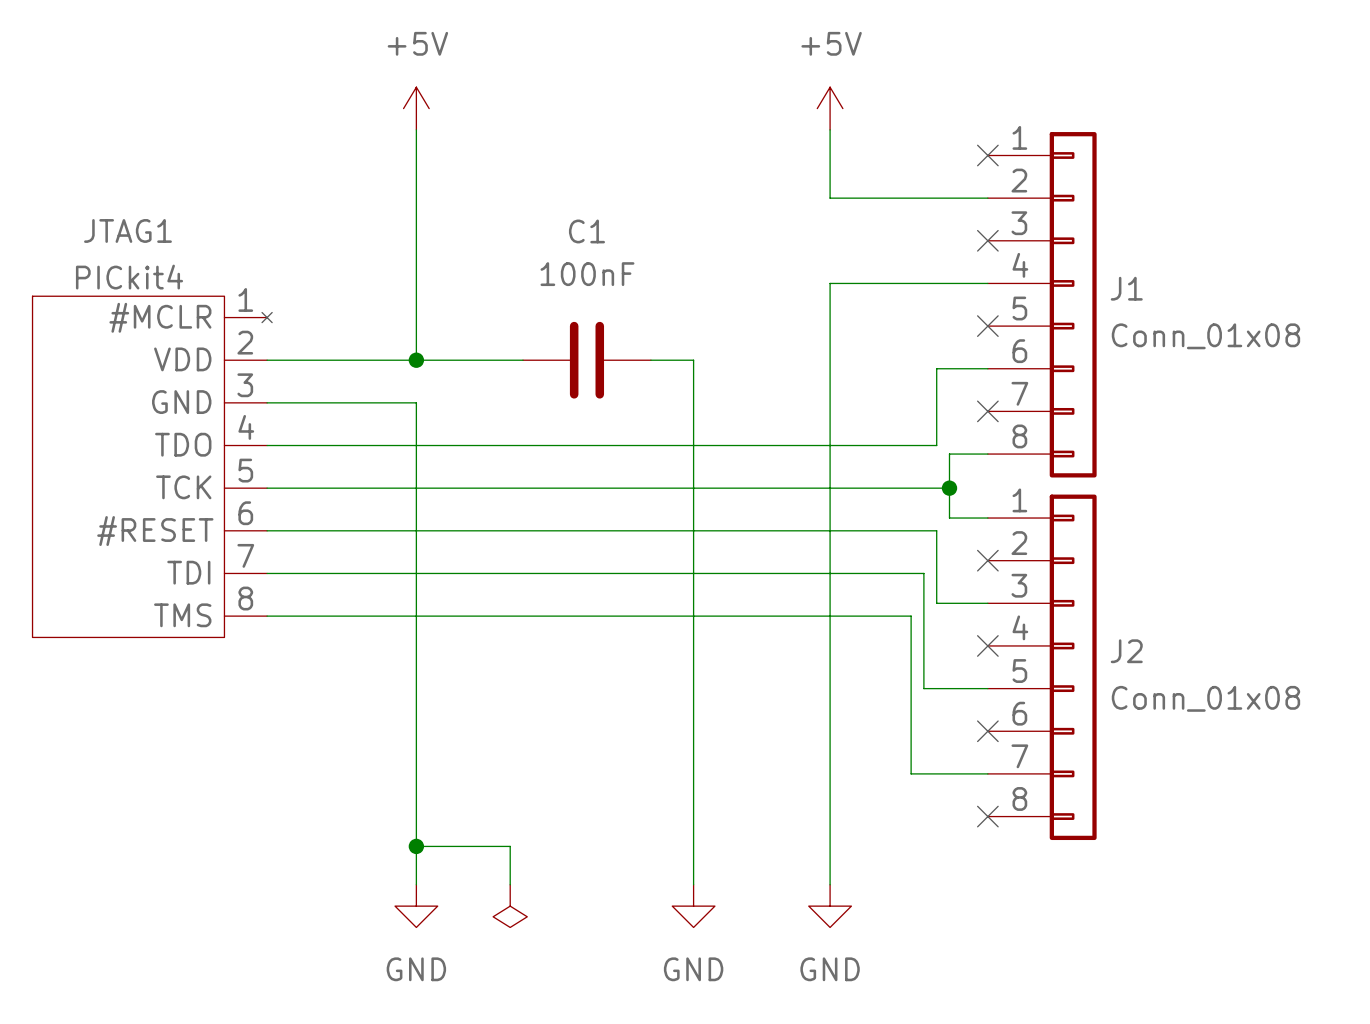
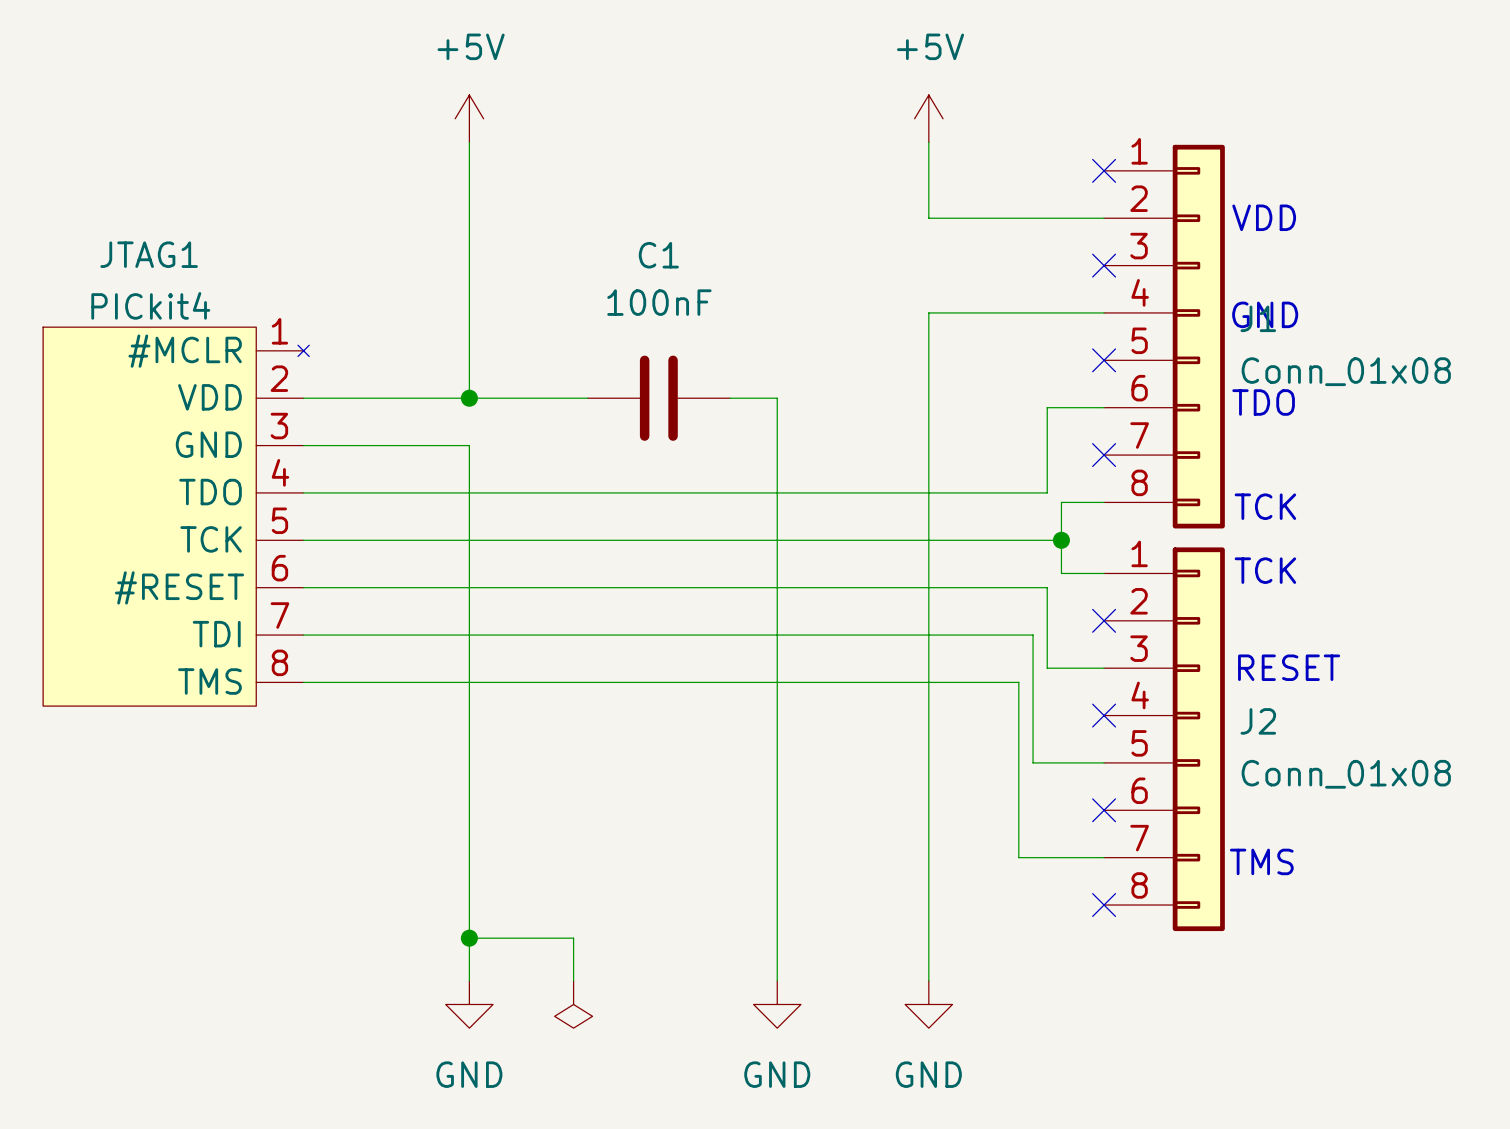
text: none -> VDD (1264, 217)
text: none -> GND (1265, 314)
text: none -> TDO (1263, 402)
text: none -> TCK (1265, 506)
text: none -> TCK (1265, 570)
text: none -> RESET (1289, 667)
text: none -> TMS (1261, 861)

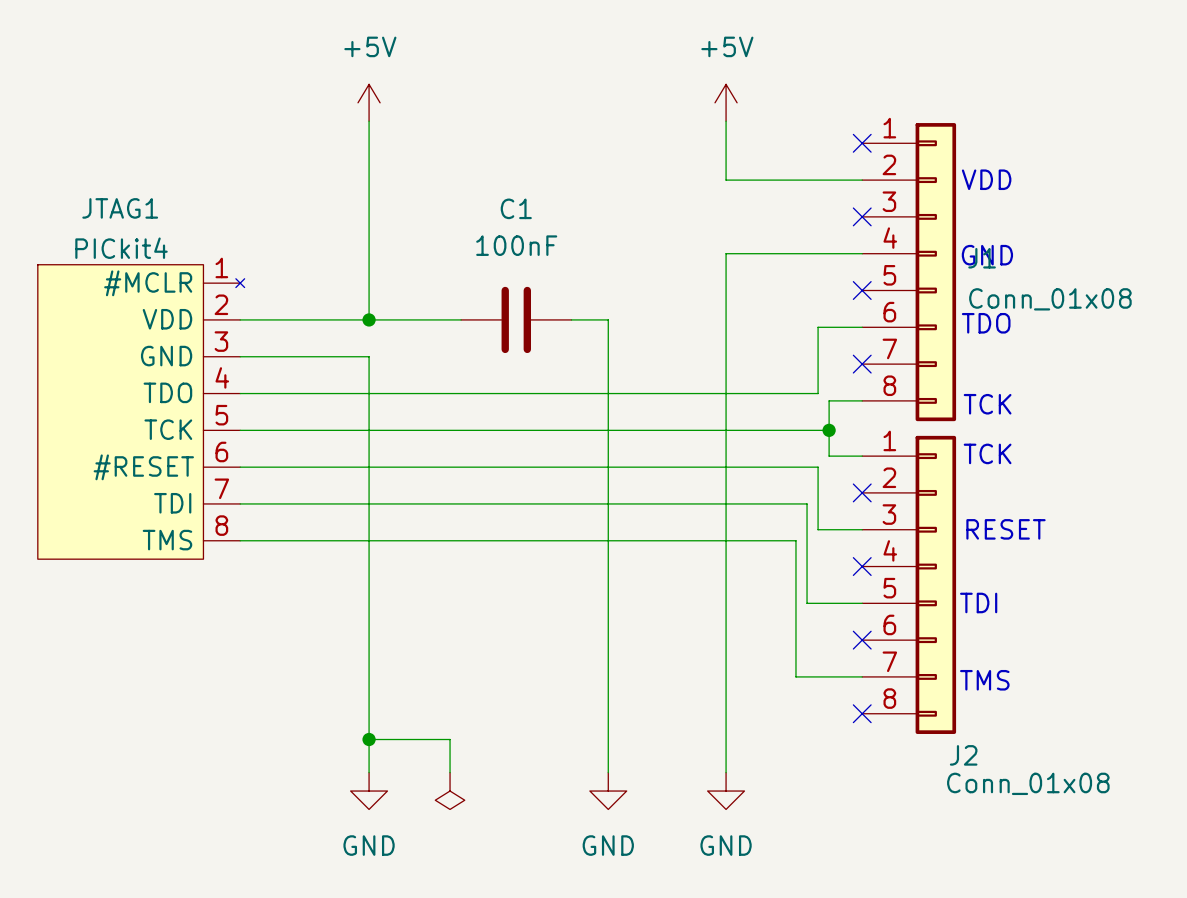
J2 name position: J2 (1258, 721) -> J2 (963, 755)
text: none -> TDI (978, 602)
J2 value position: Conn_01x08 (1346, 774) -> Conn_01x08 (1028, 783)

